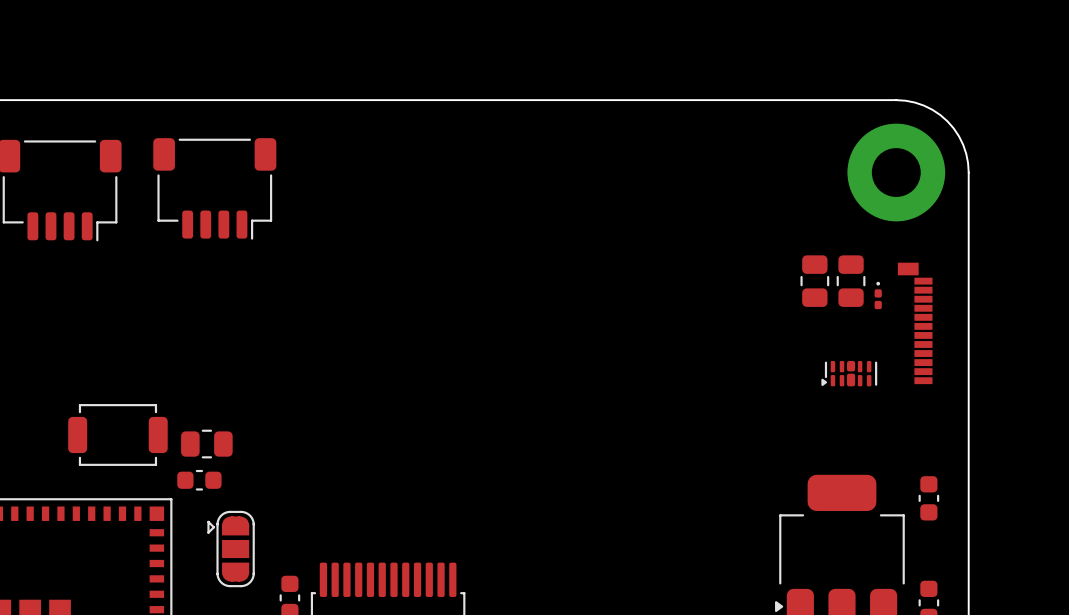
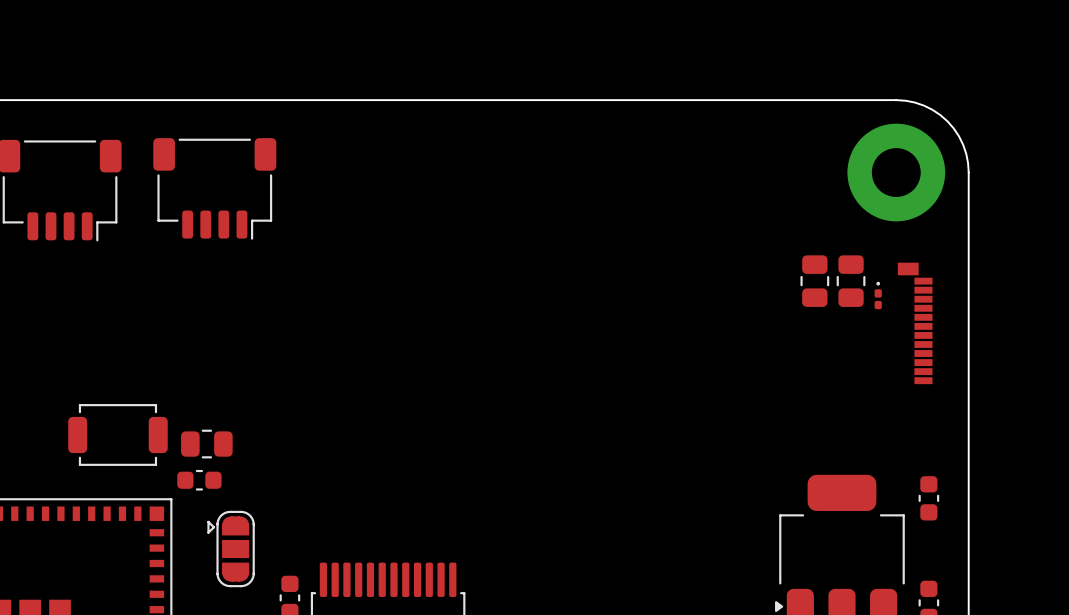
part: (849, 373) -> none

